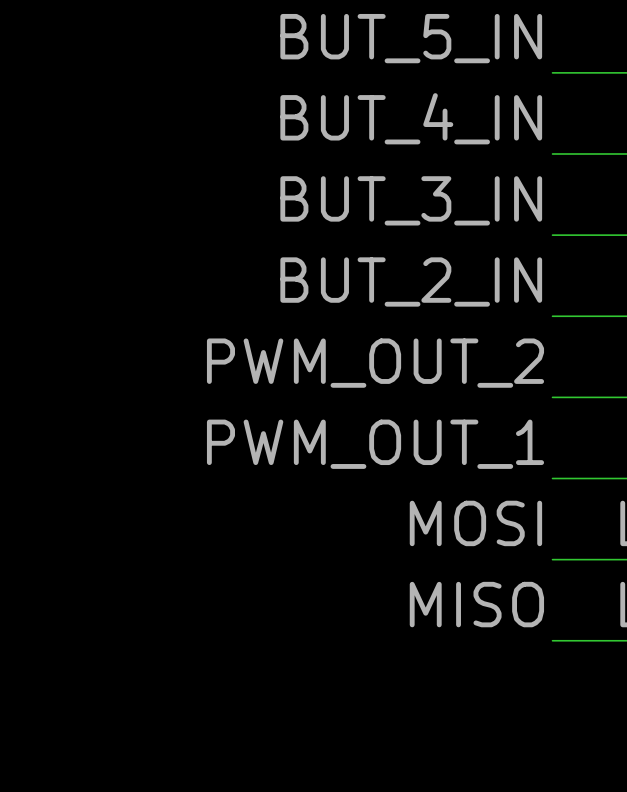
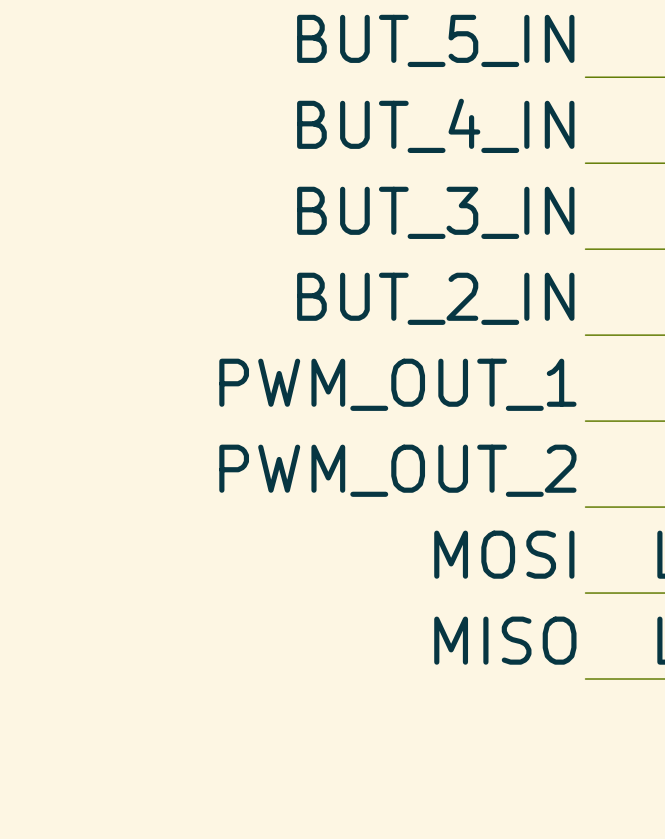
label: PWM_OUT_2 (375, 363) -> PWM_OUT_1 (397, 384)
label: PWM_OUT_1 (375, 444) -> PWM_OUT_2 (397, 470)

